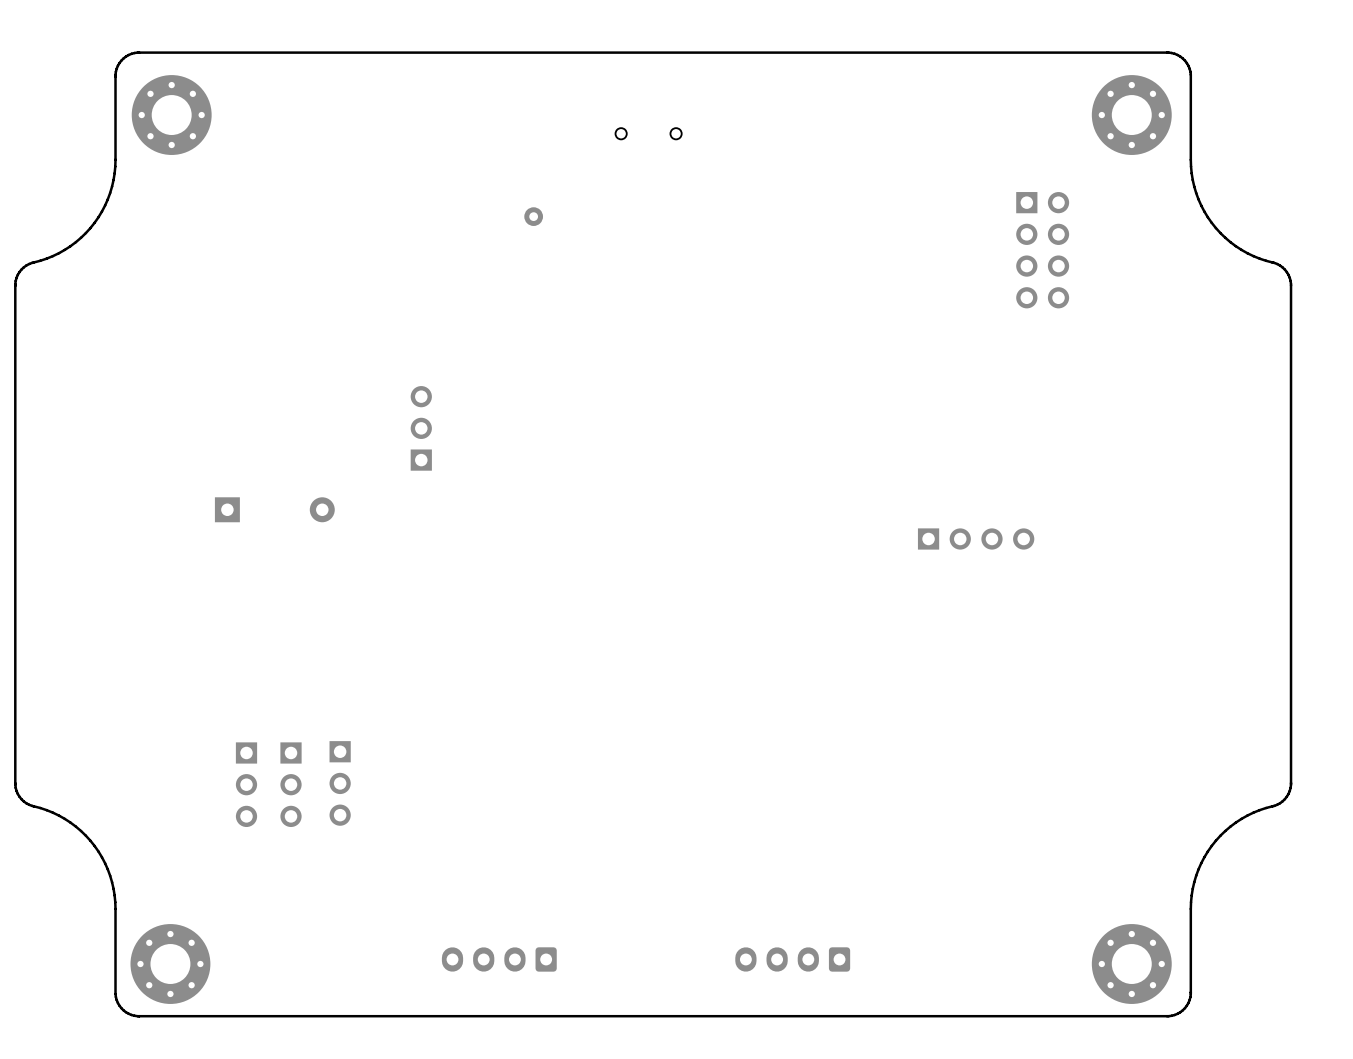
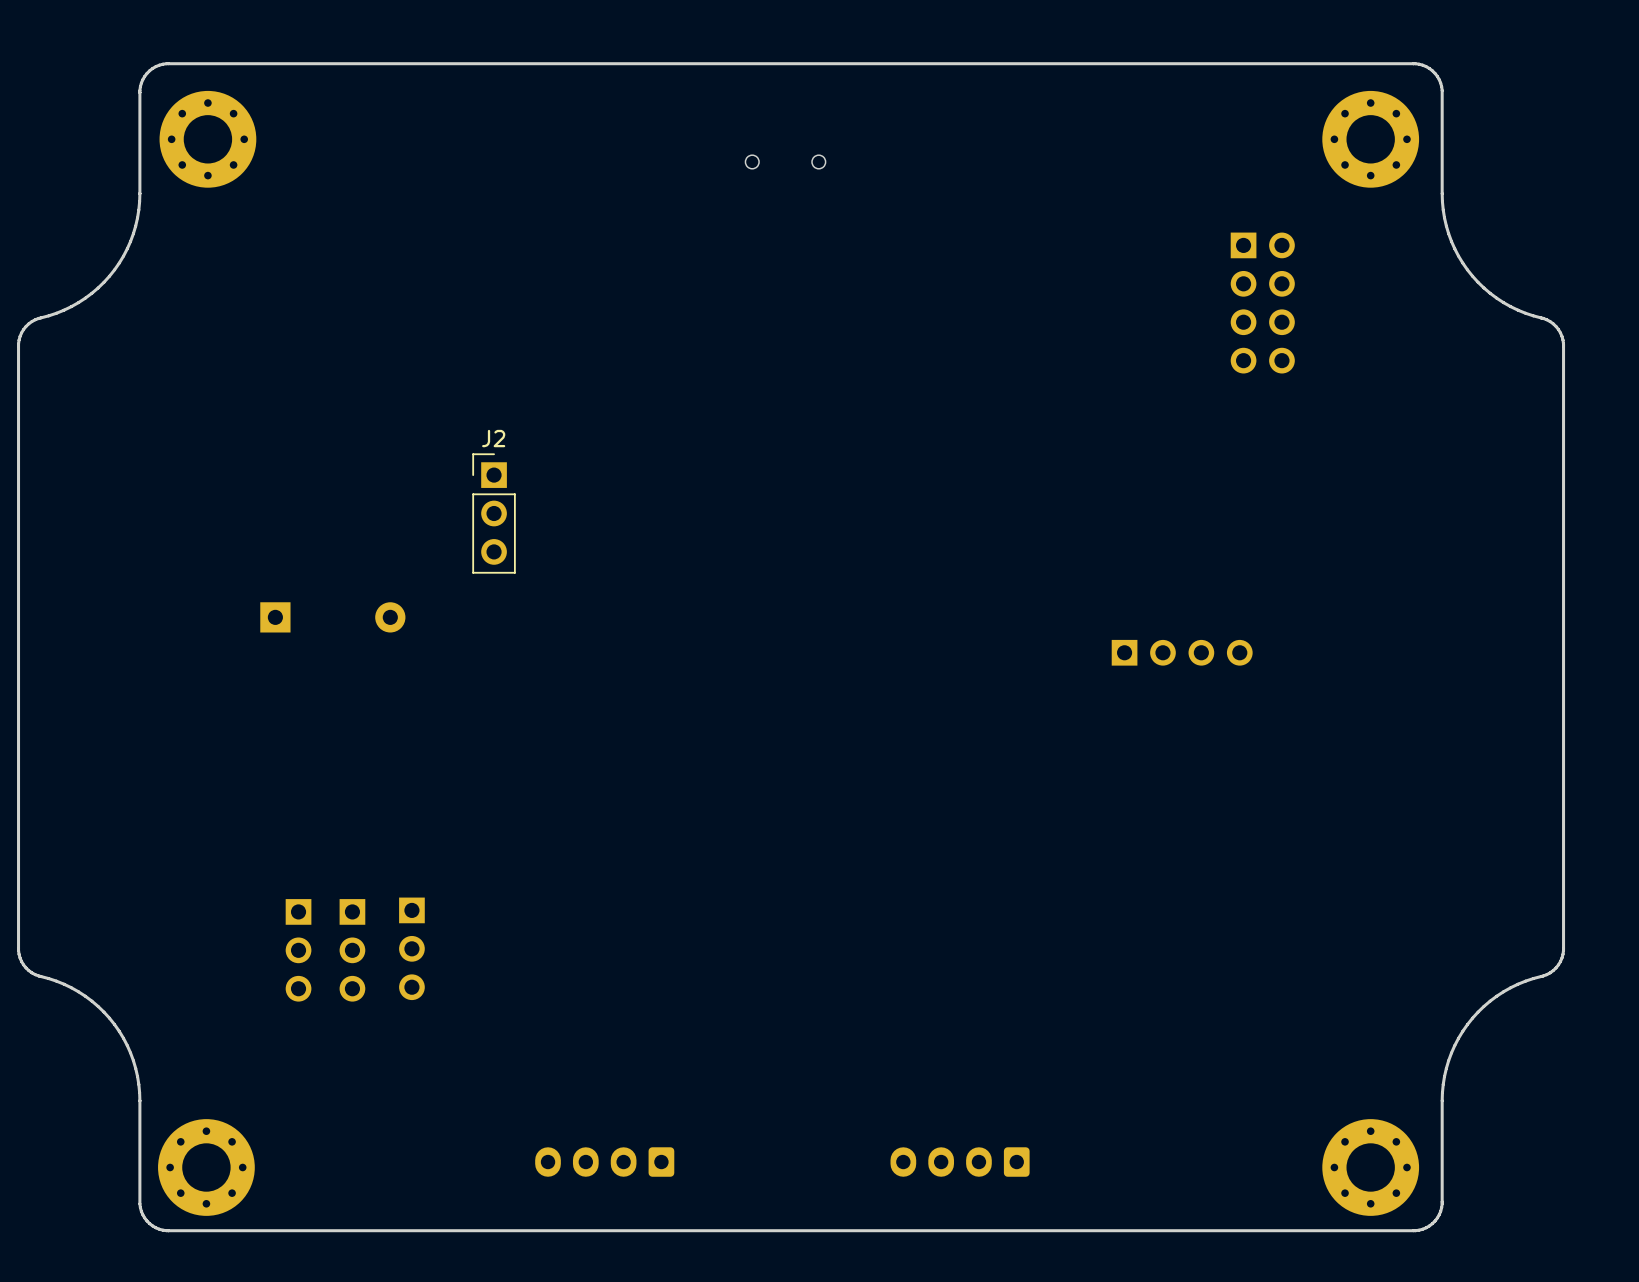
part: (533, 216) -> none
J2 side: top (421, 428) -> bottom (494, 513)

